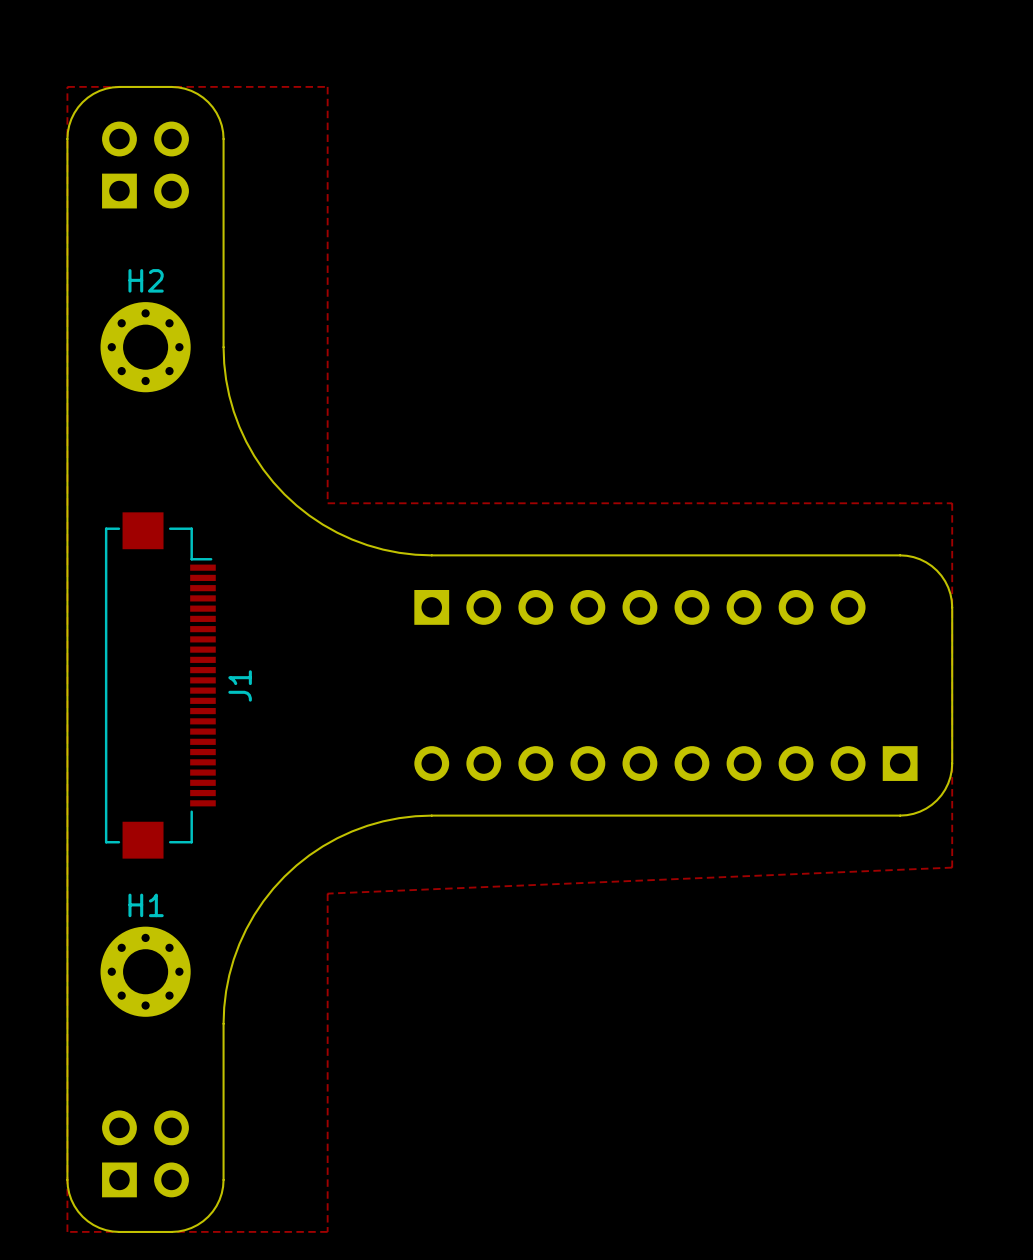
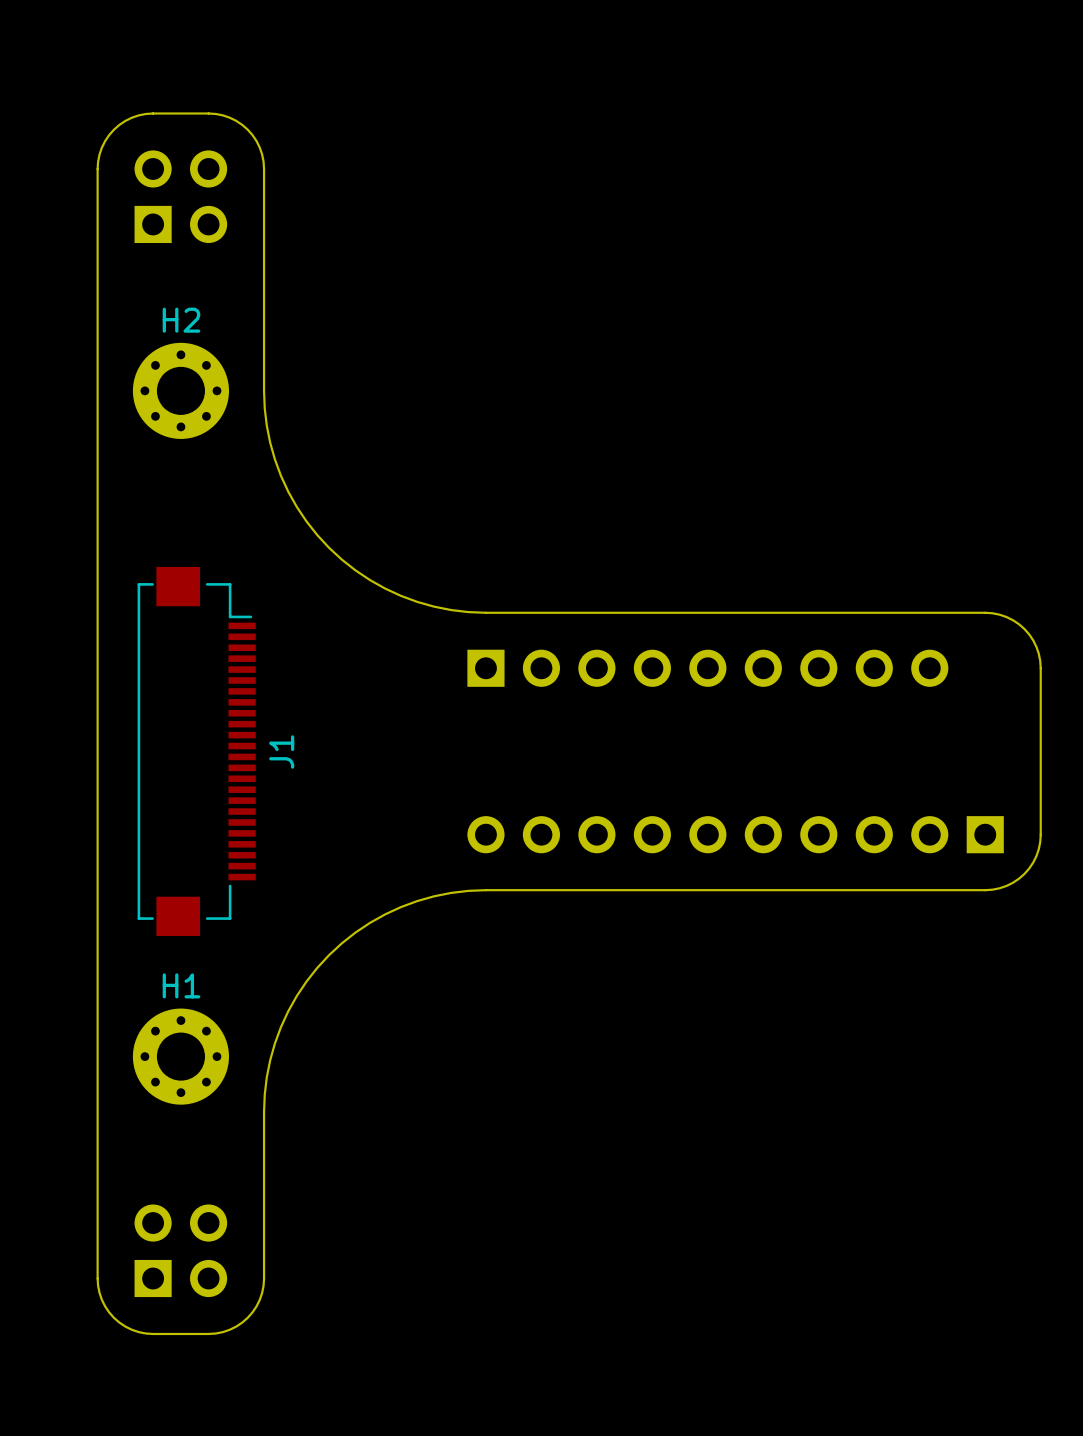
zone outline: (67, 86) (67, 1231) (327, 1231) (327, 893) (952, 867) (952, 503) (327, 503) (327, 86) (67, 86) -> none

